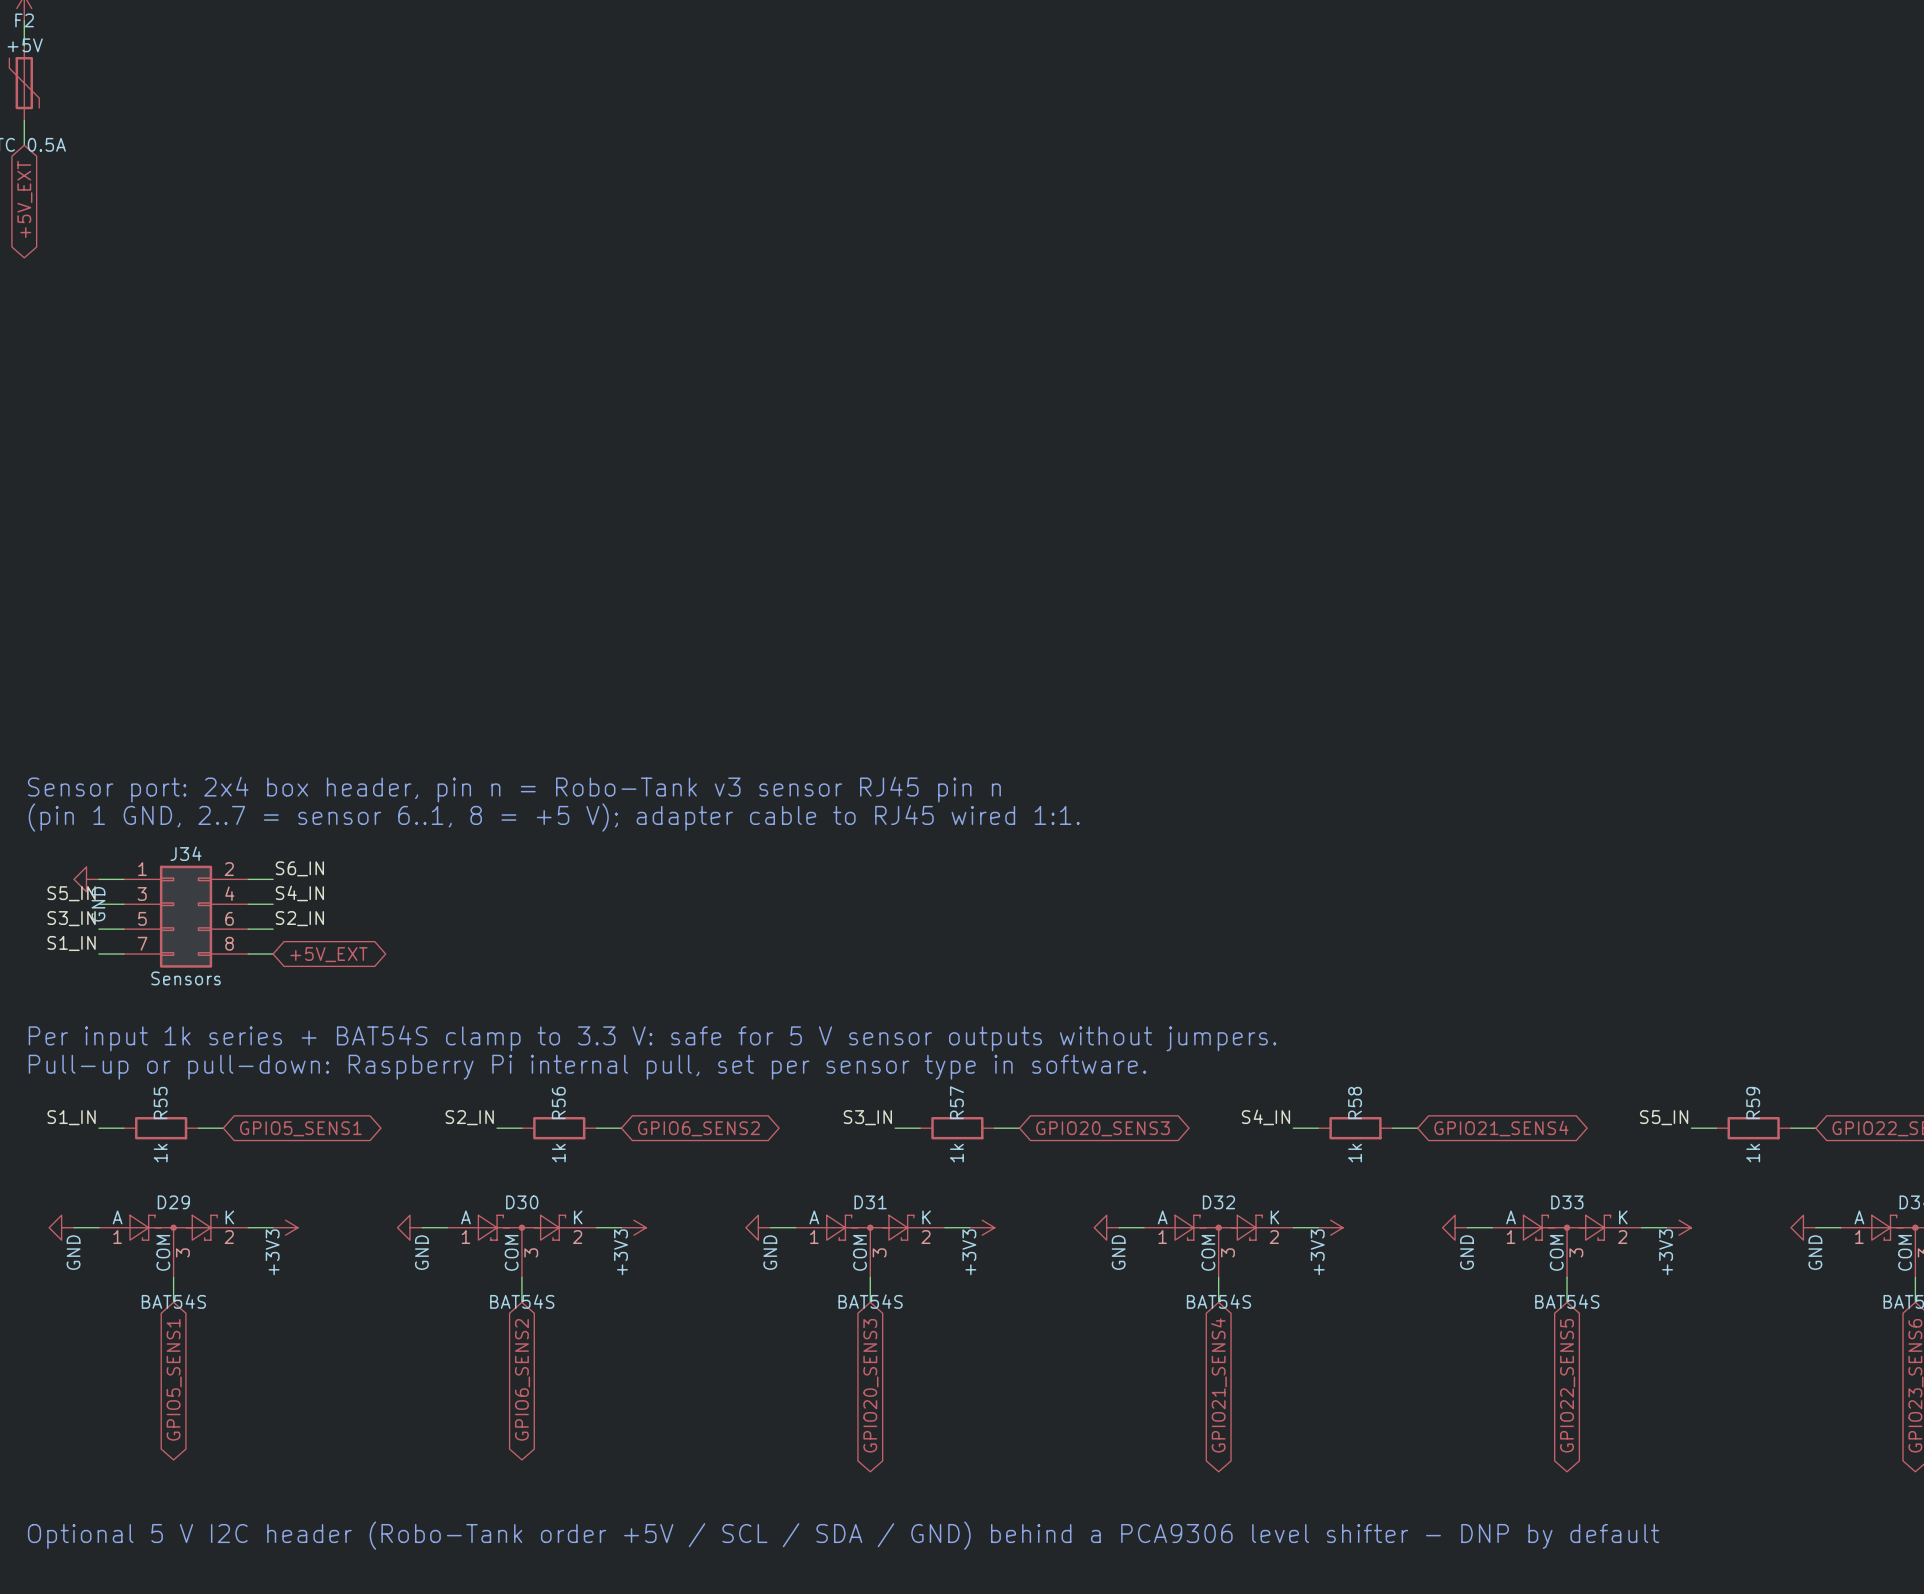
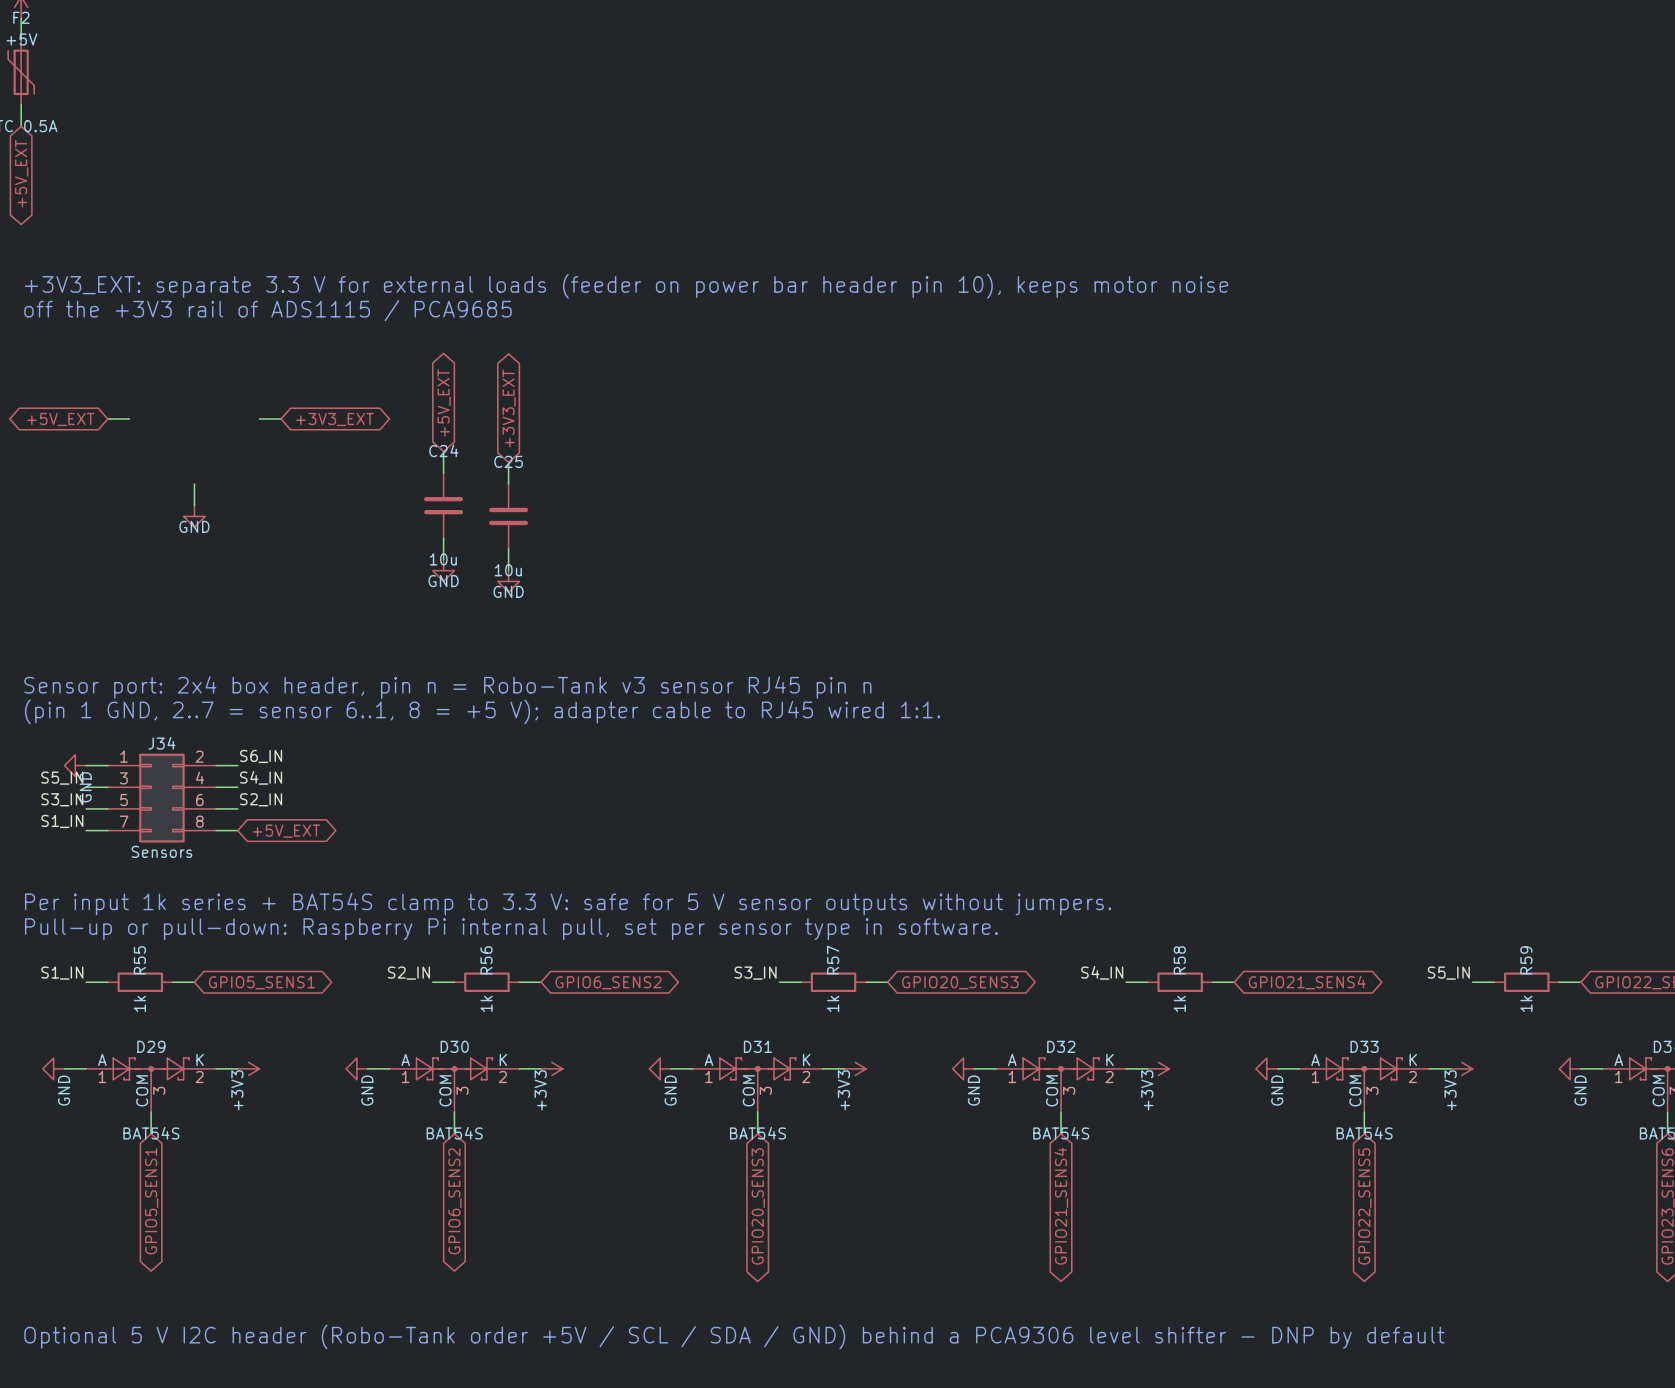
text: none -> +3V3_EXT: separate 3.3 V for external loads (feeder on power bar header pin 10), keeps motor noise (626, 286)
text: none -> off the +3V3 rail of ADS1115 / PCA9685 (268, 310)
global label: none -> +5V_EXT (444, 402)
global label: none -> +3V3_EXT (509, 408)
global label: none -> +5V_EXT (60, 419)
wire: none -> (107, 418) (129, 418)
wire: none -> (259, 418) (281, 418)
global label: none -> +3V3_EXT (334, 419)
wire: none -> (443, 451) (443, 473)
wire: none -> (508, 462) (508, 483)
wire: none -> (194, 483) (194, 505)
C24: none -> 10u (443, 505)
power symbol: none -> GND (194, 516)
C25: none -> 10u (508, 516)
wire: none -> (443, 538) (443, 559)
wire: none -> (508, 548) (508, 570)
power symbol: none -> GND (443, 570)
power symbol: none -> GND (508, 581)

